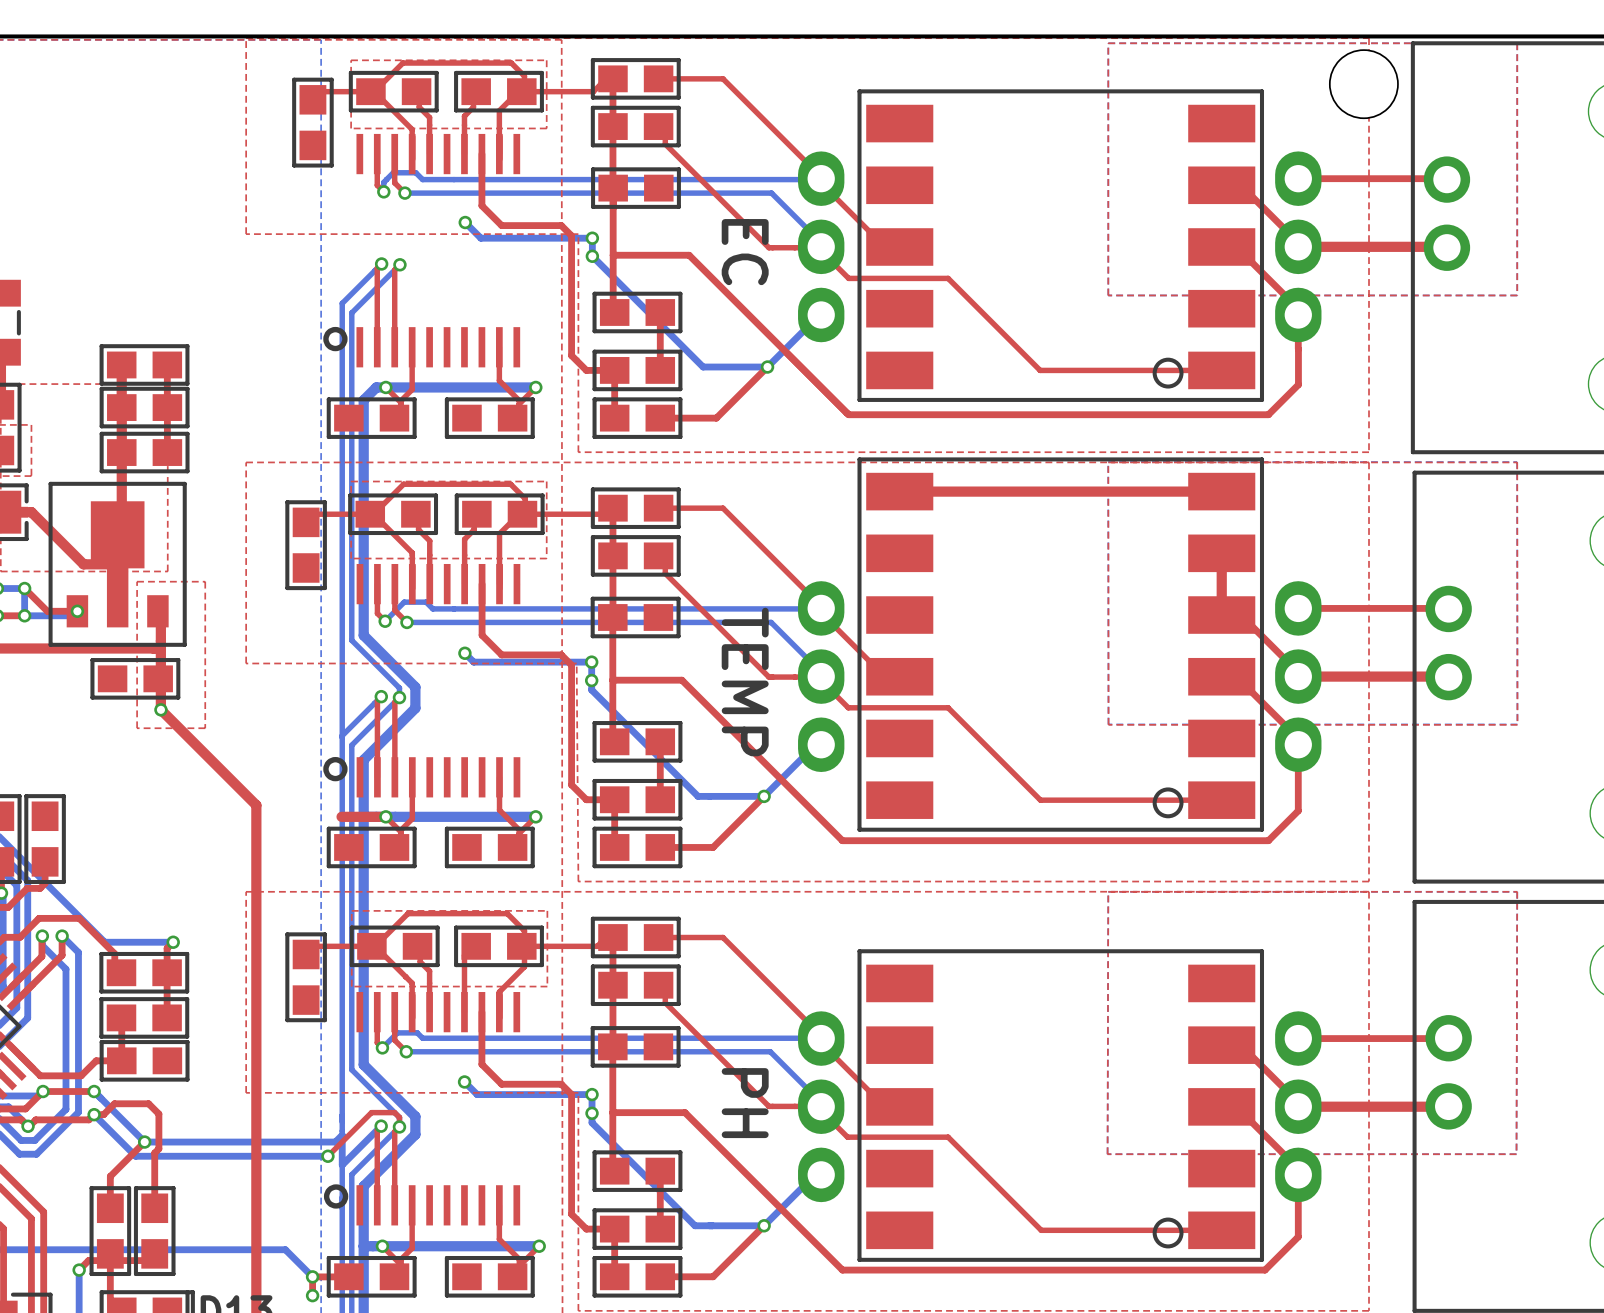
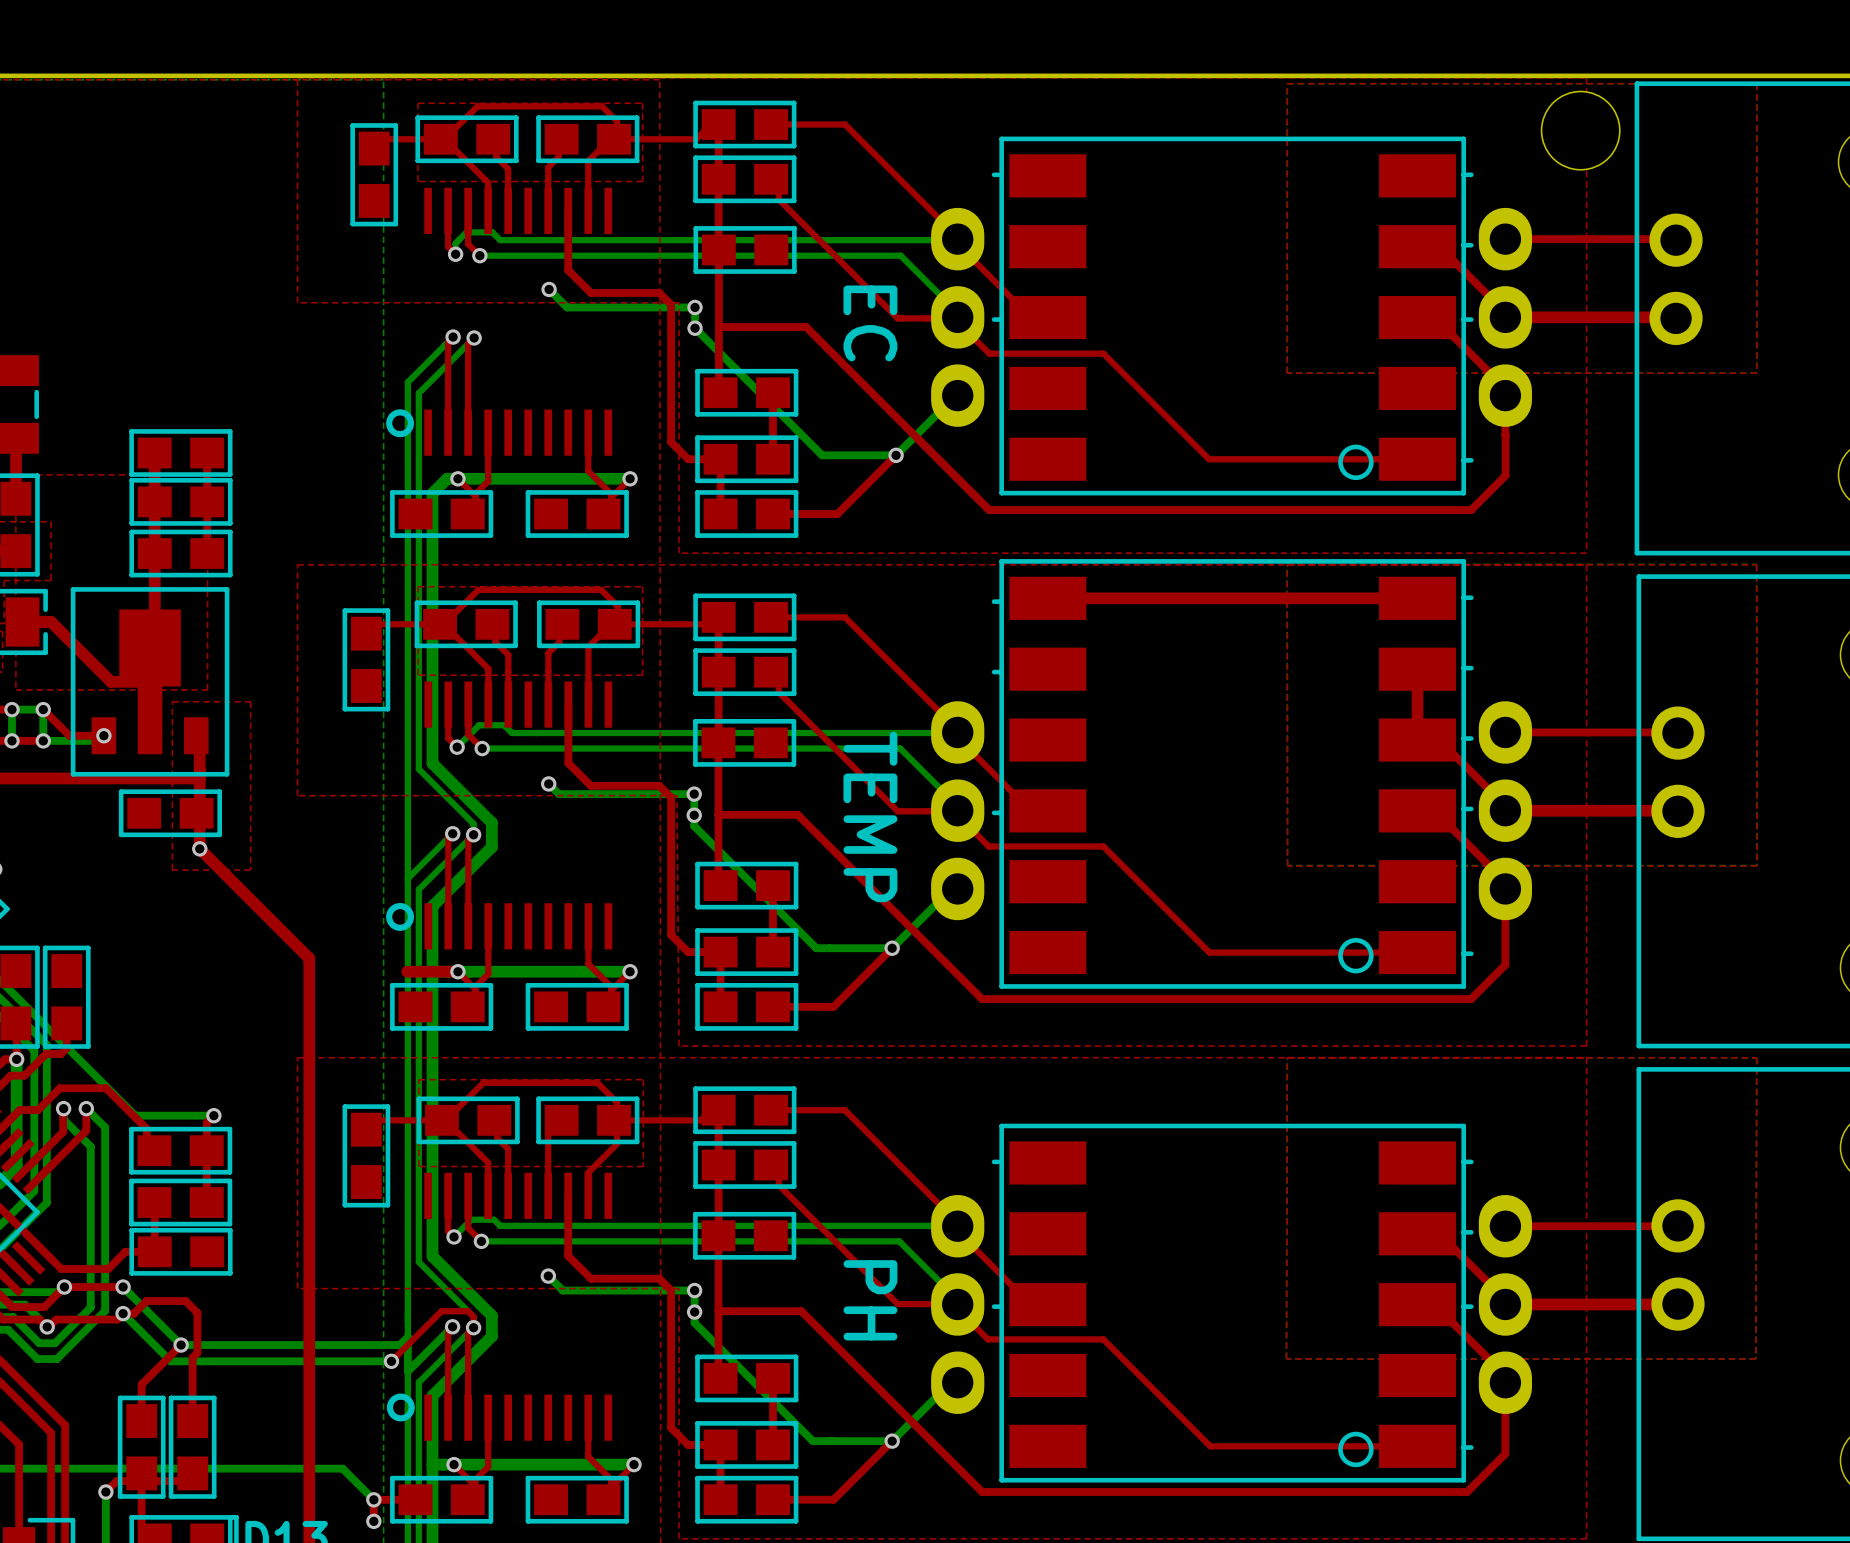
part footprint: [798, 89, 1322, 402] -> [931, 136, 1532, 496]
part footprint: [798, 457, 1322, 832] -> [931, 559, 1532, 989]
part footprint: [798, 949, 1322, 1262] -> [931, 1123, 1532, 1483]

